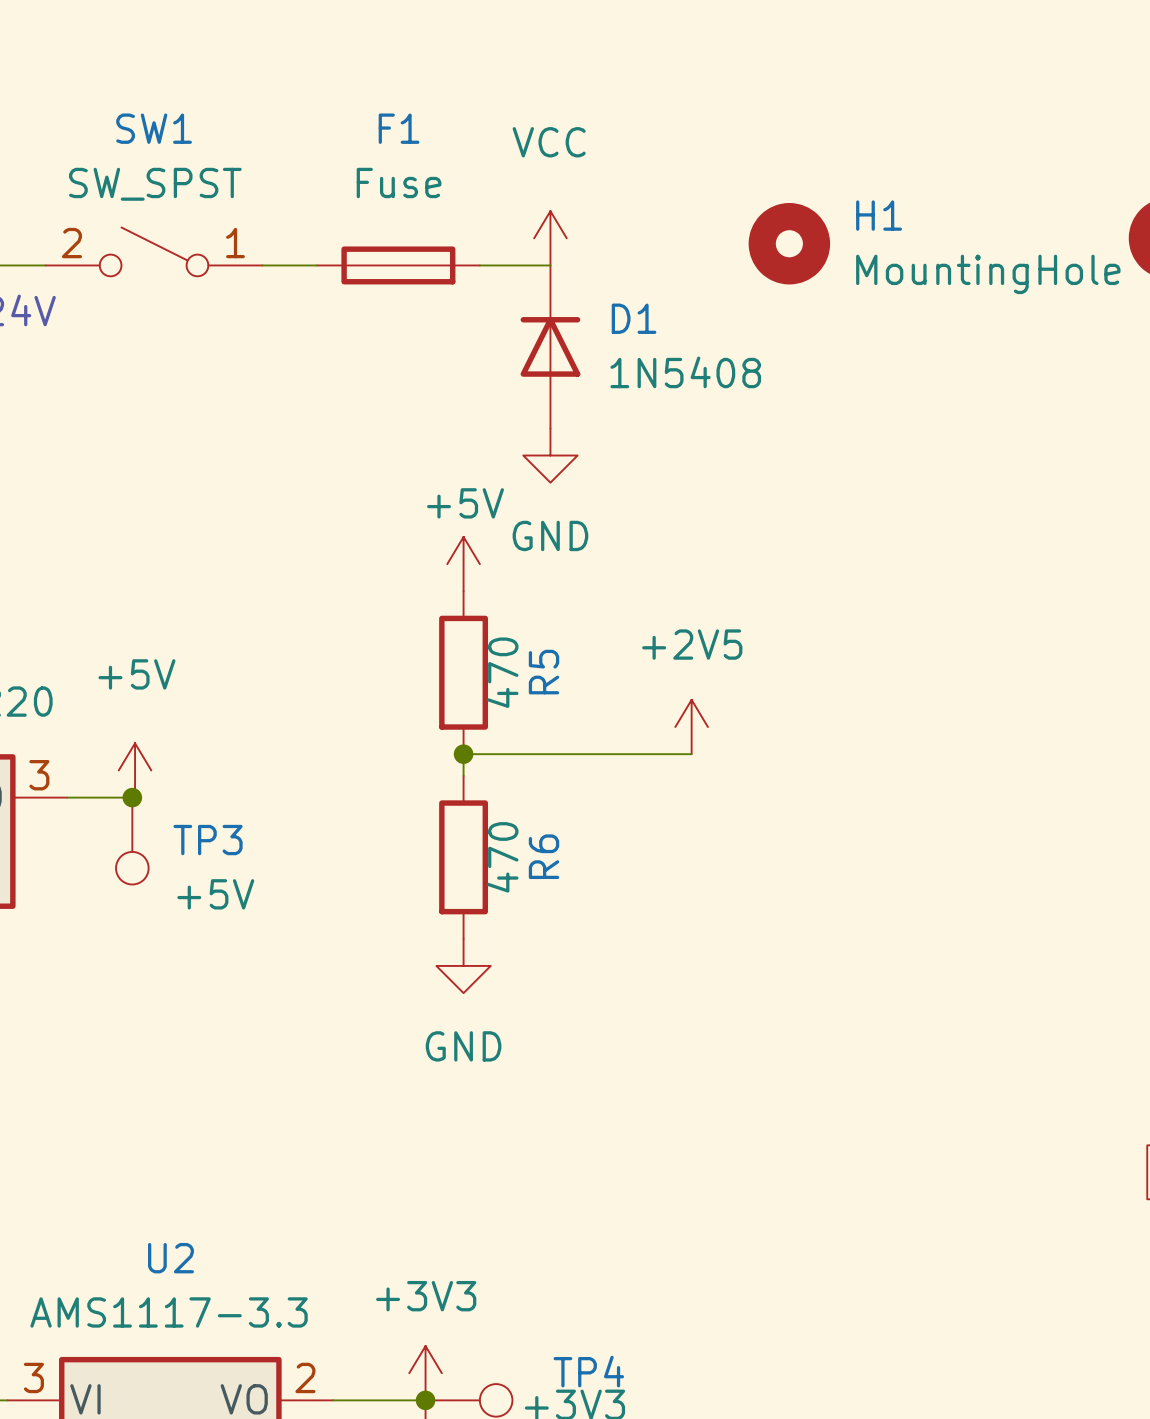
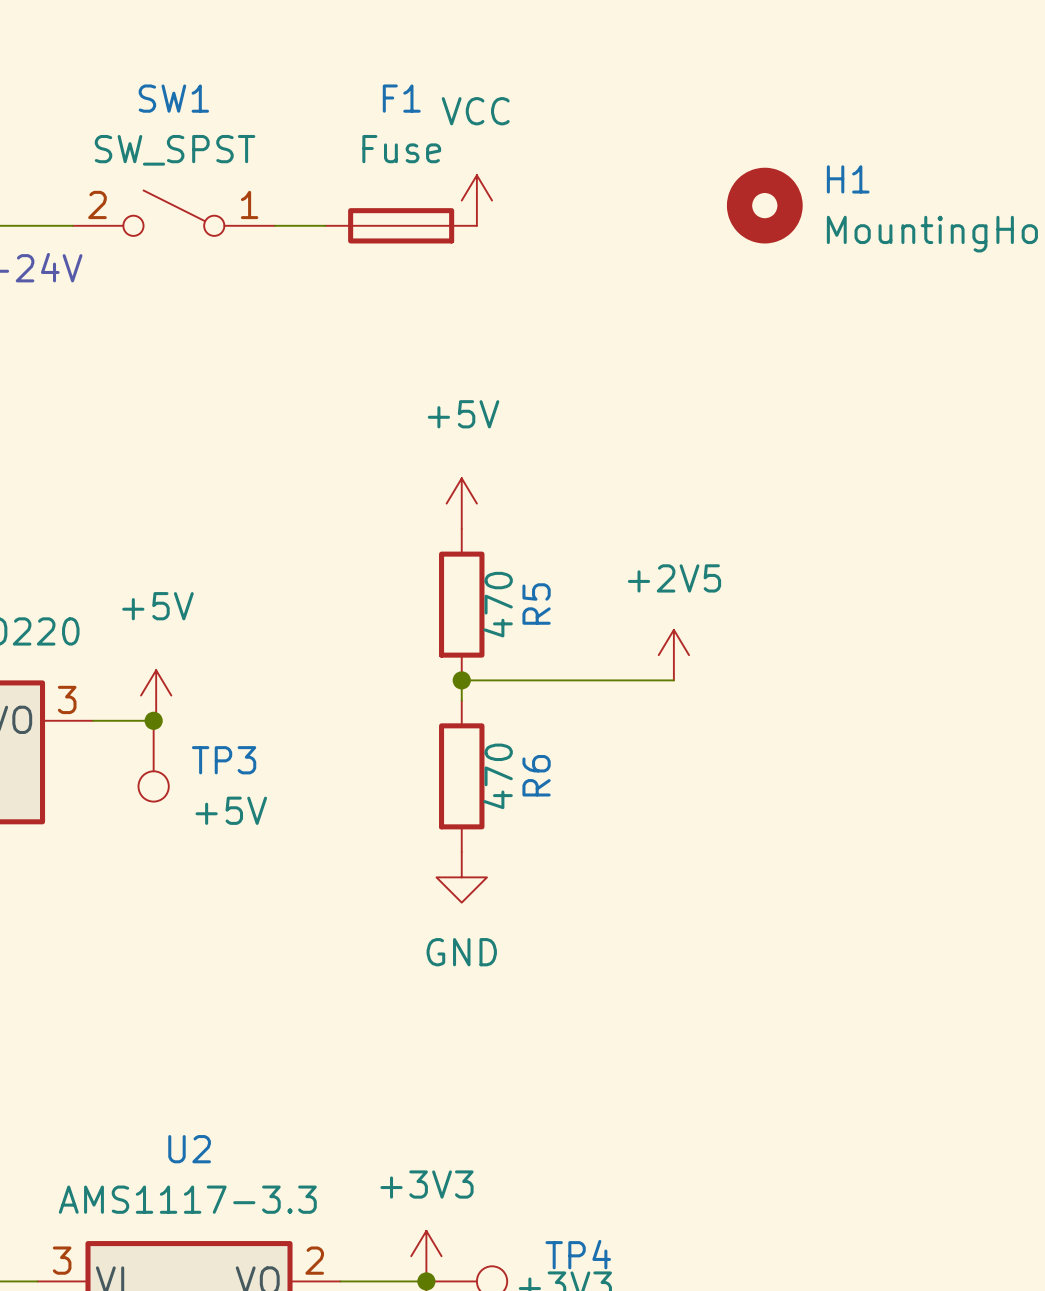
power symbol position: VCC (550, 238) -> VCC (476, 200)
wire: (479, 265) (550, 265) -> none
D1: 1N5408 (550, 346) -> none
power symbol: GND (550, 455) -> none
power symbol text position: +5V (465, 503) -> +5V (463, 414)

